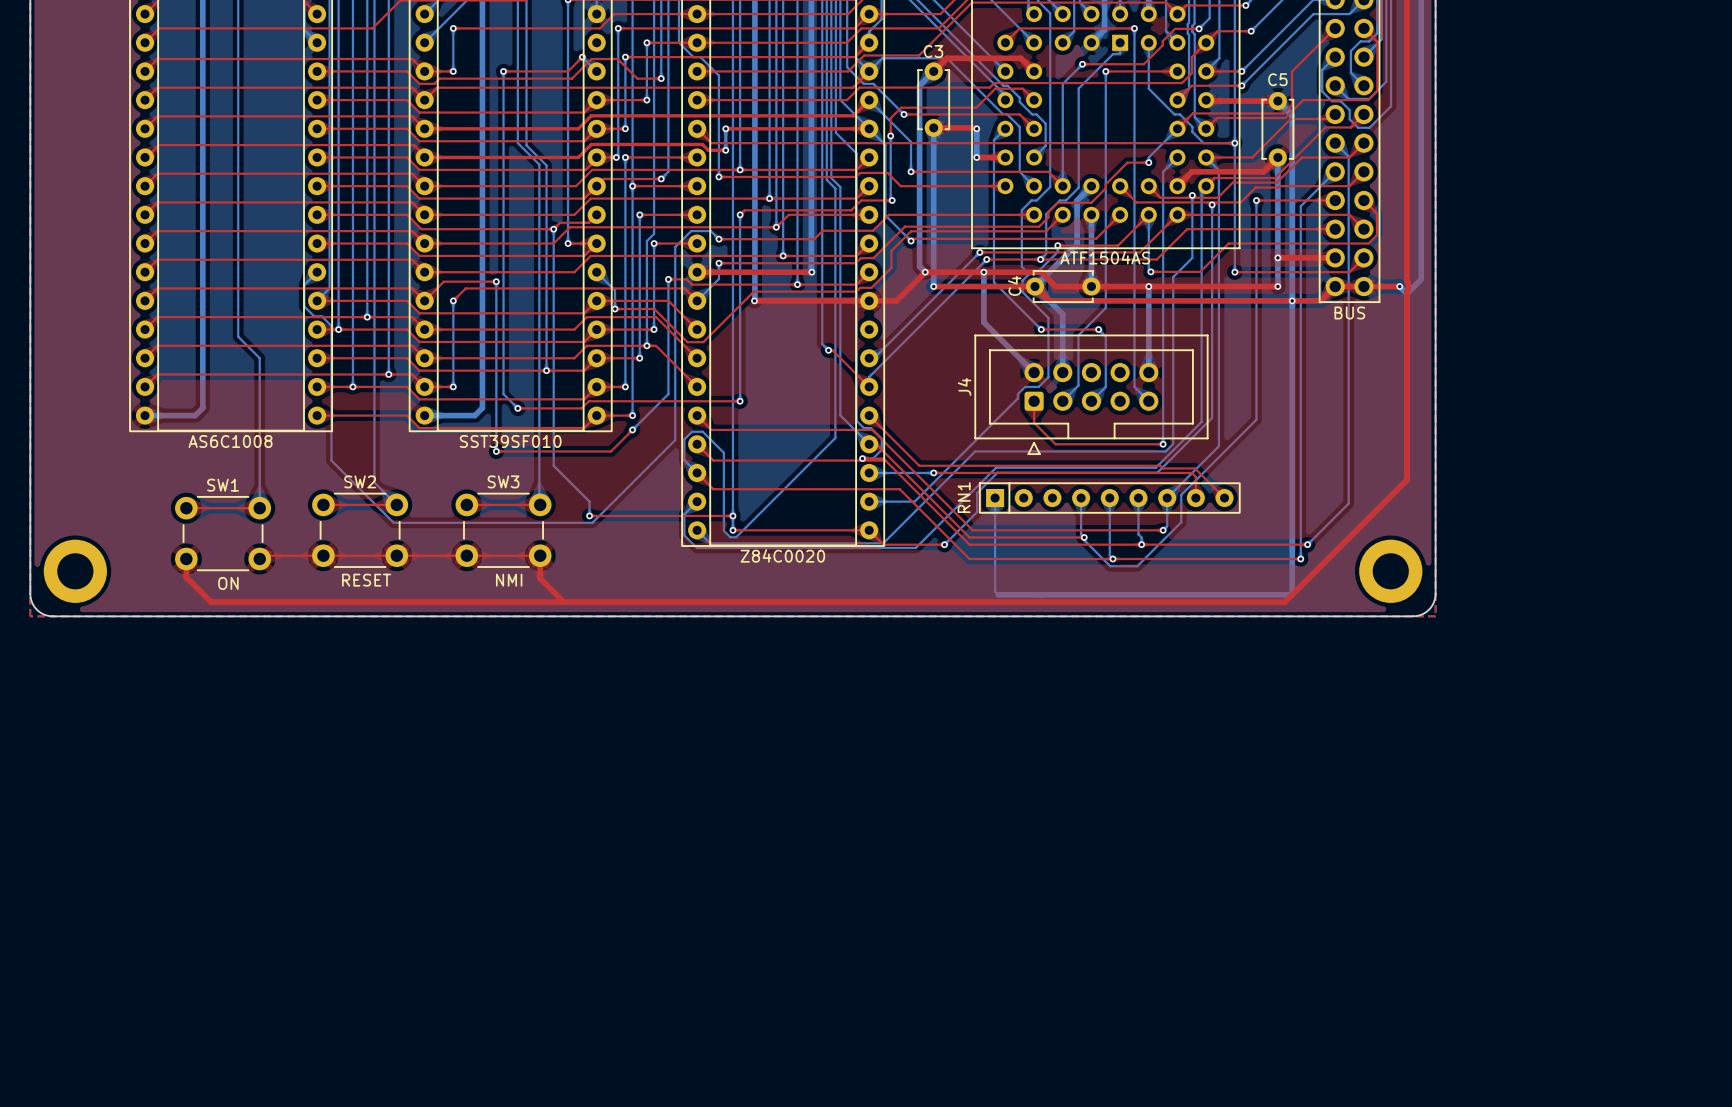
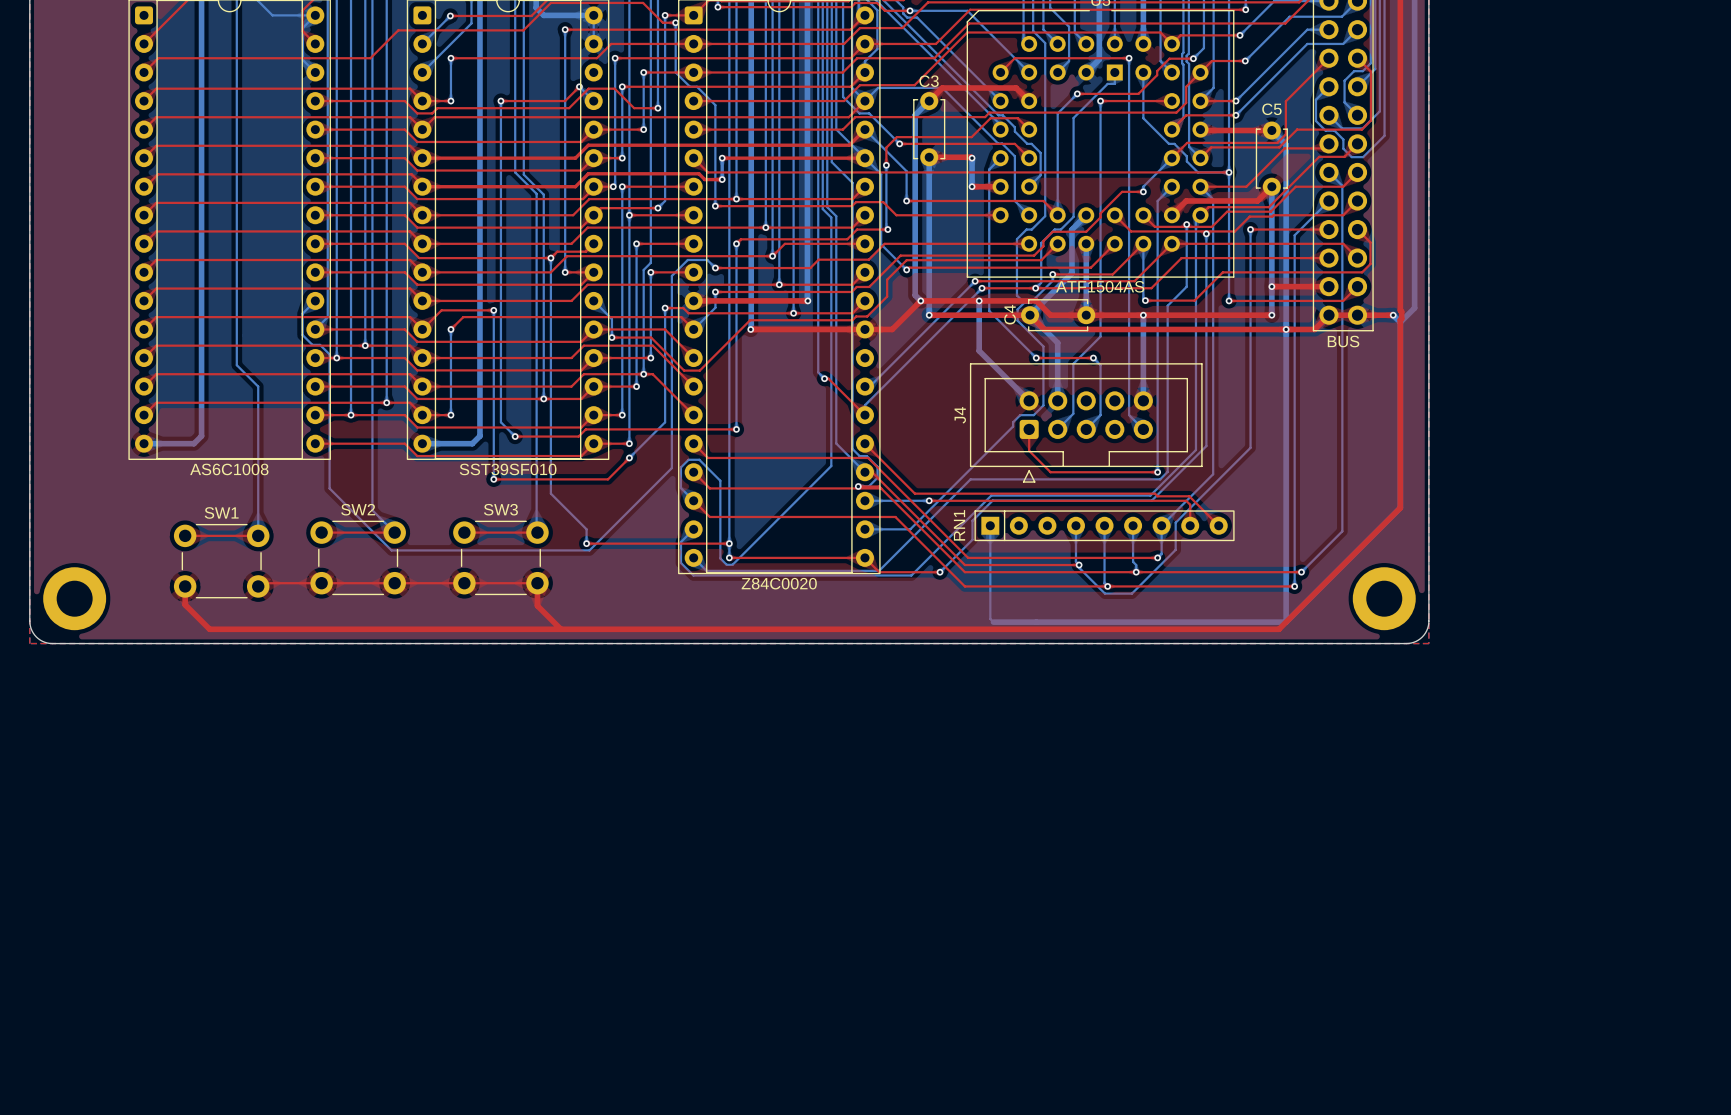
SW2 value: RESET (366, 580) -> none
SW3 value: NMI (509, 580) -> none
SW1 value: ON (228, 583) -> none

